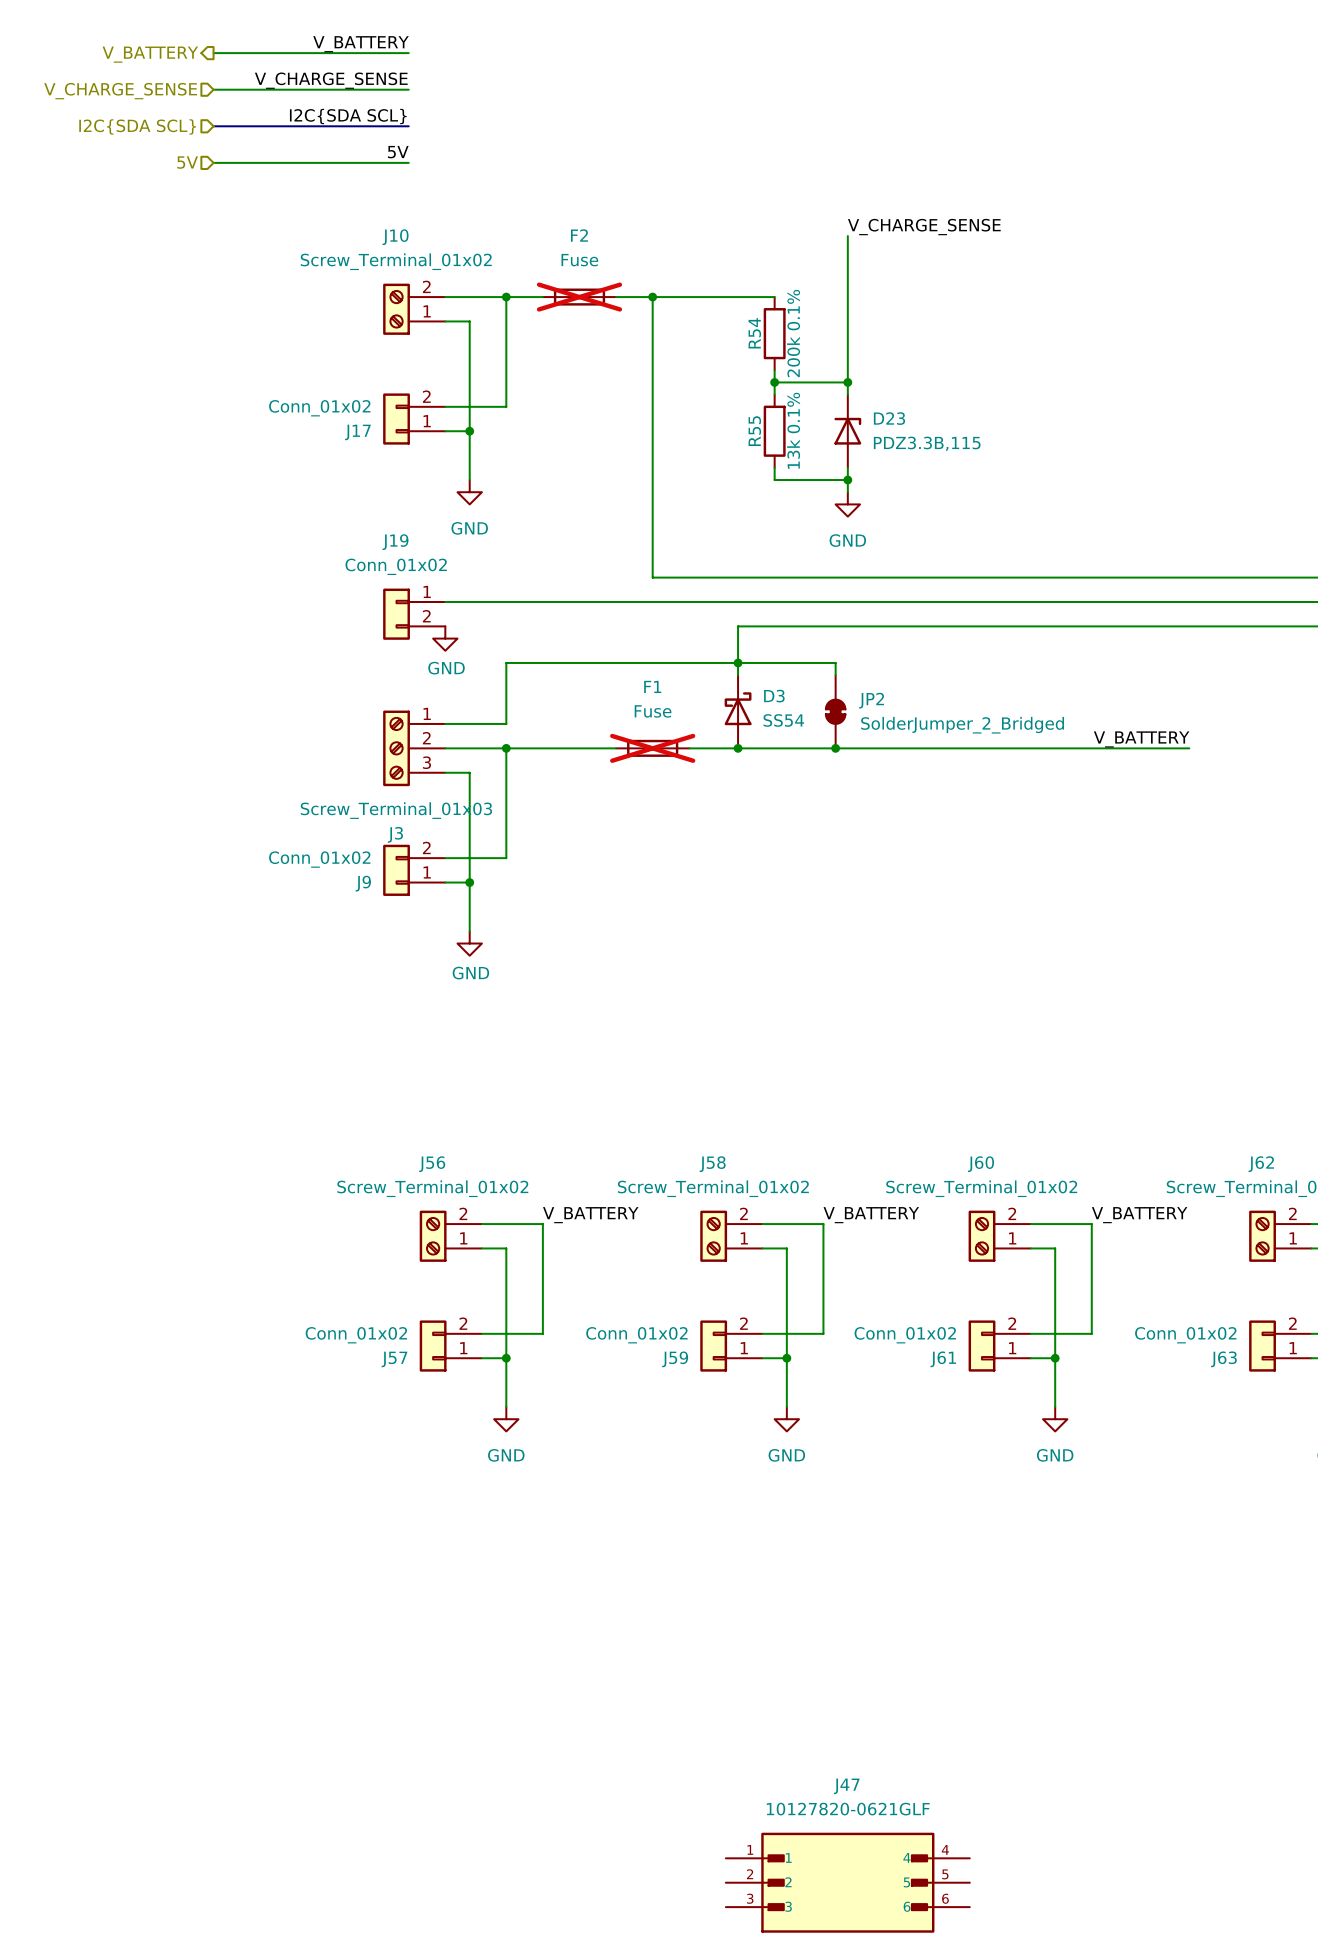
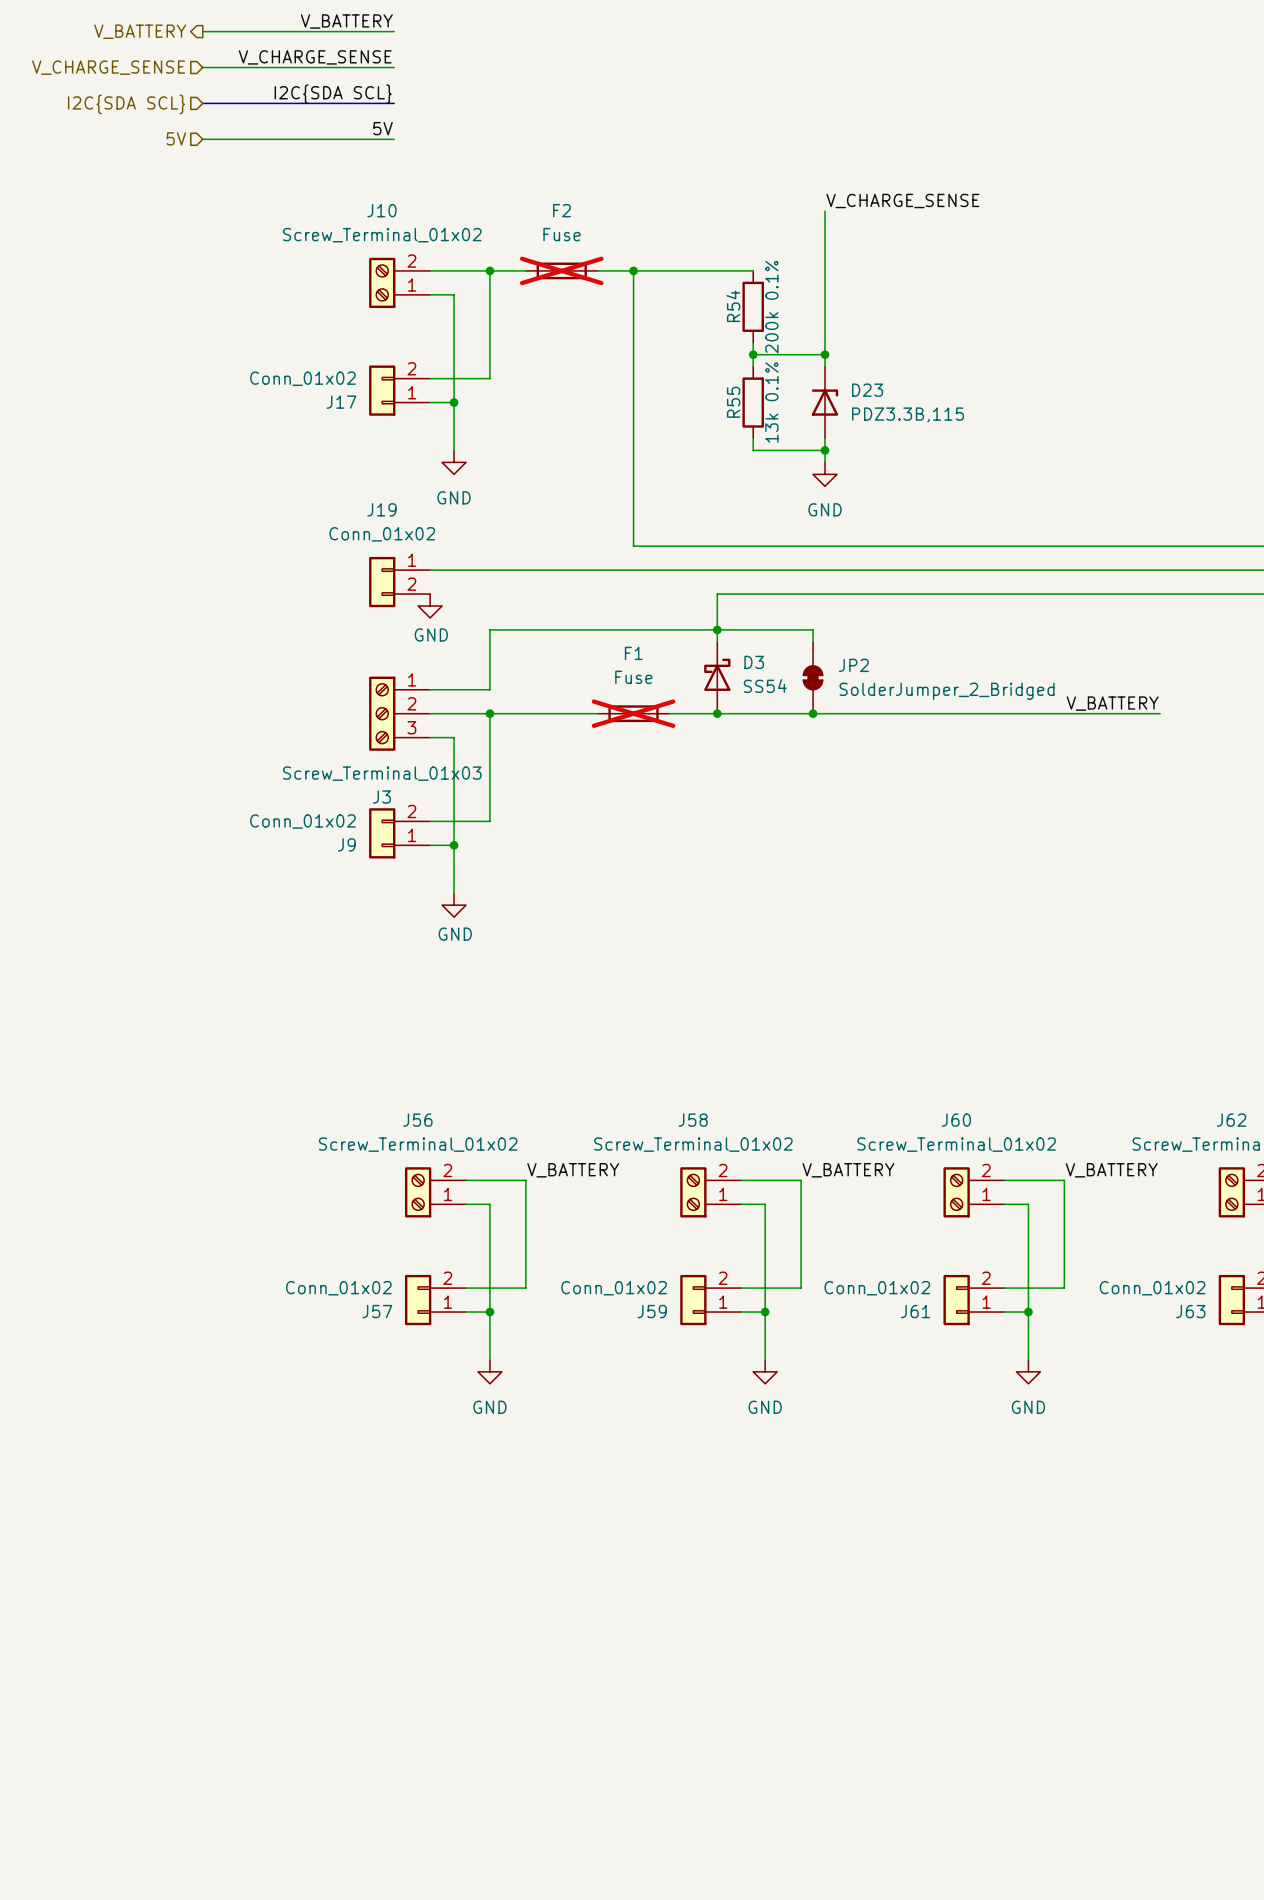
J47: 10127820-0621GLF (847, 1882) -> none

